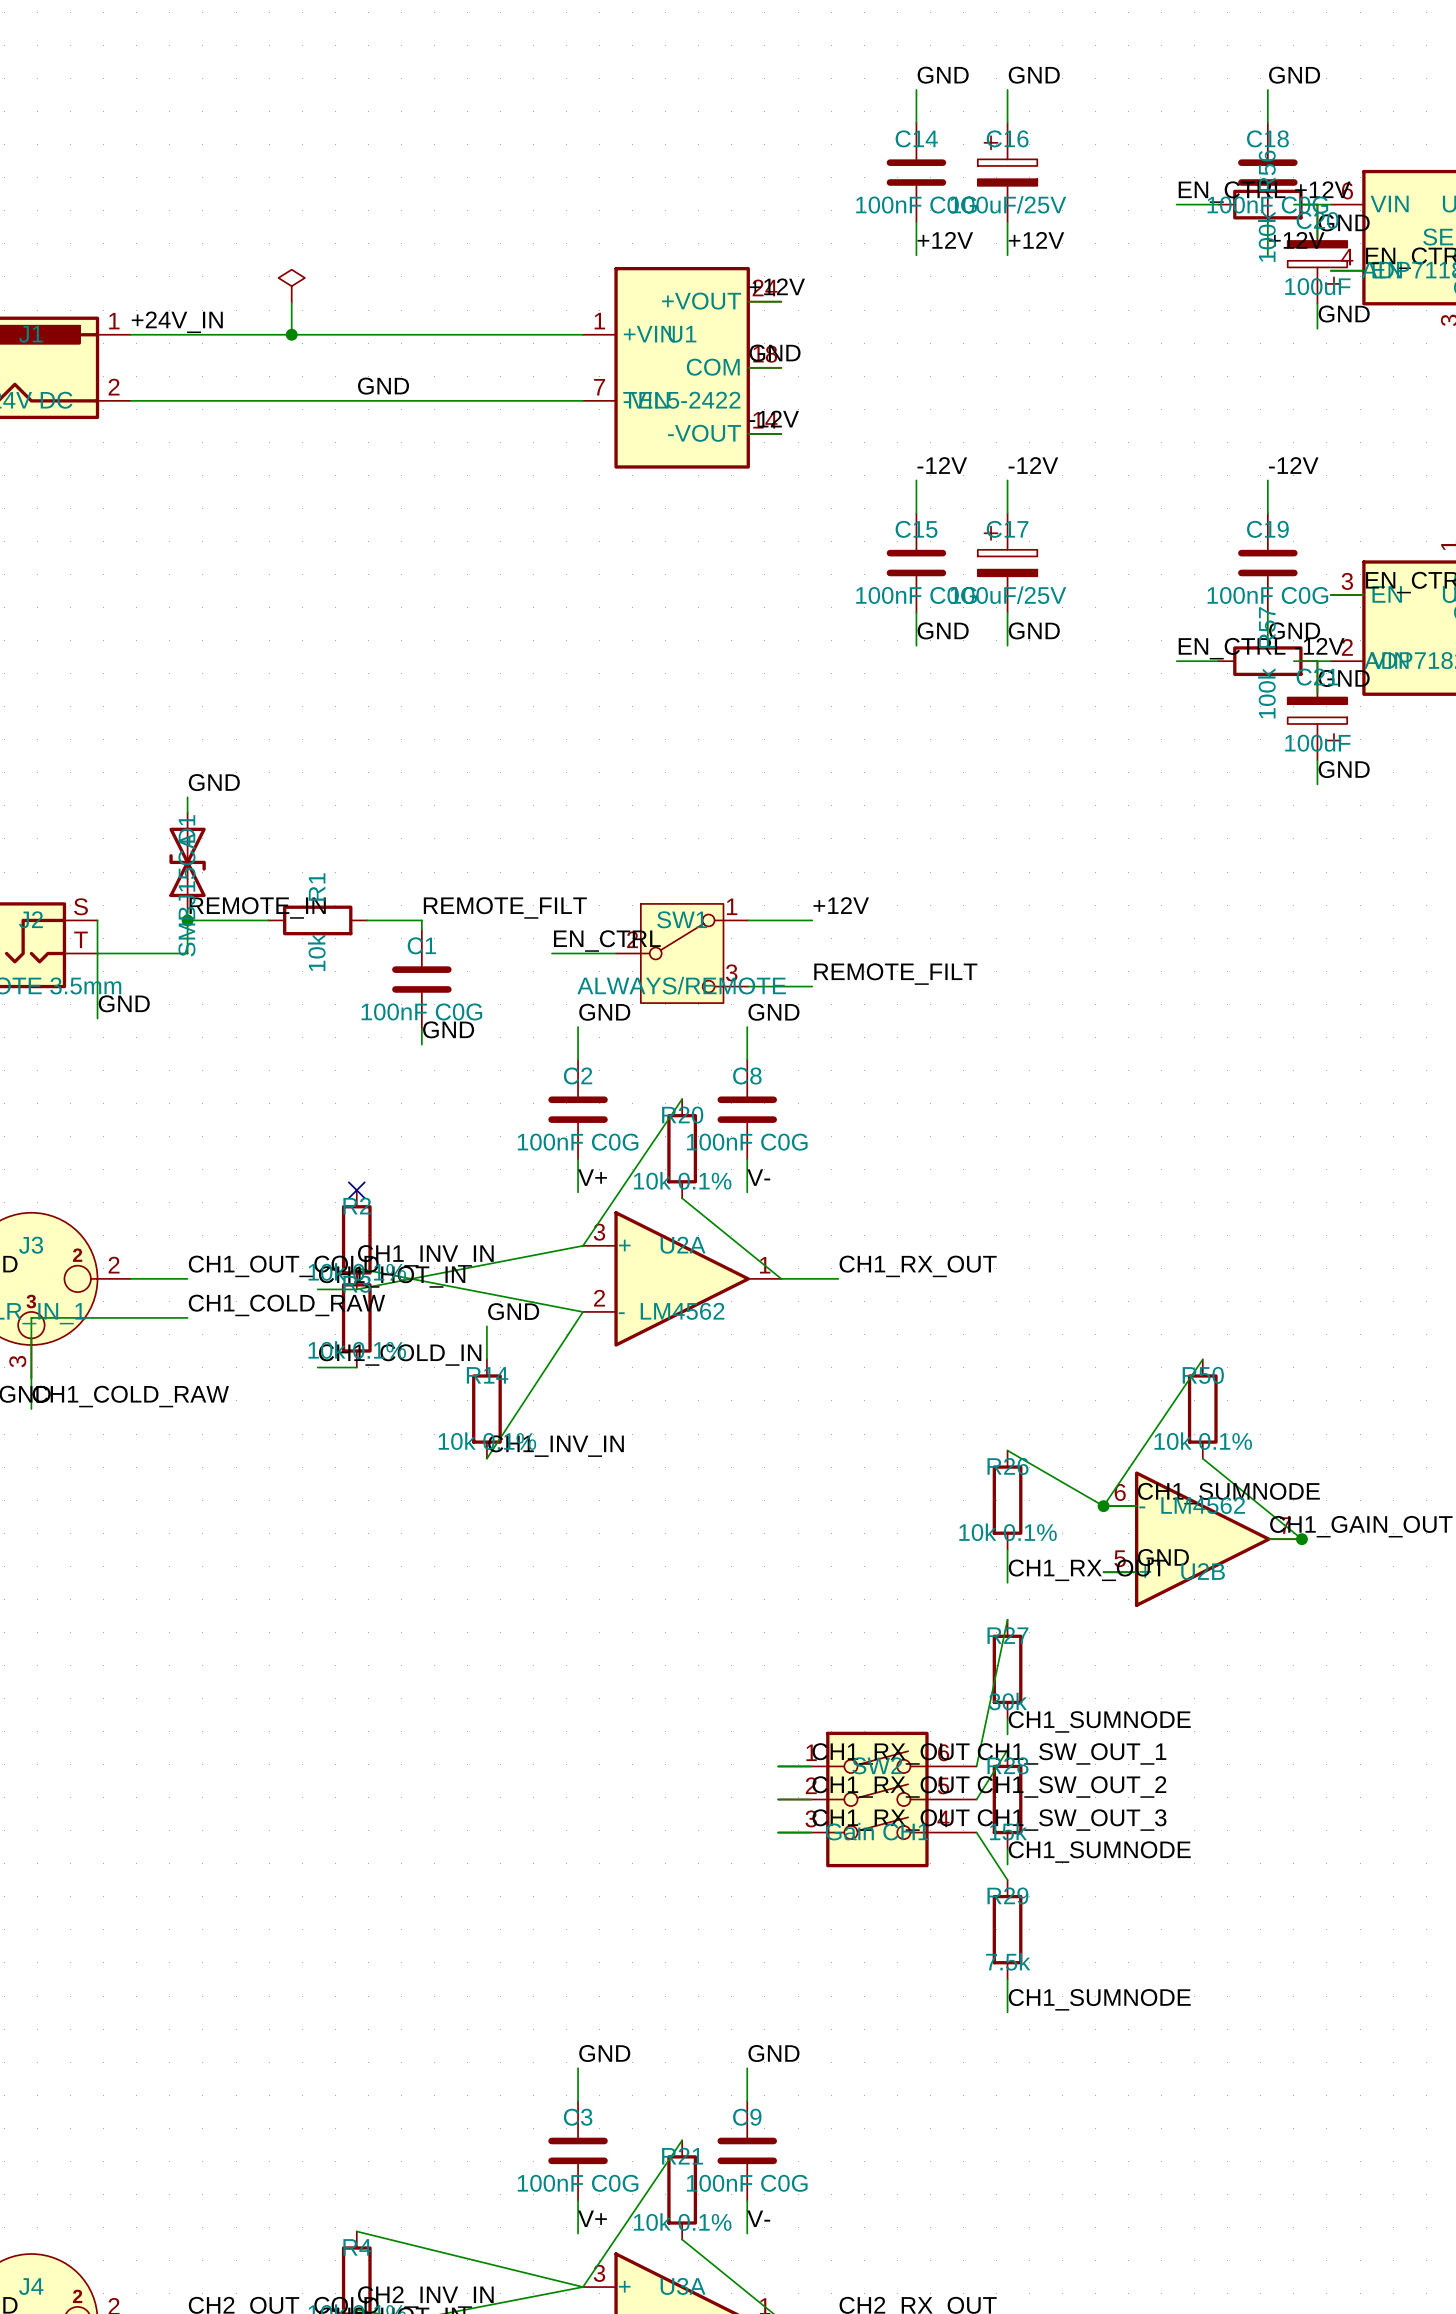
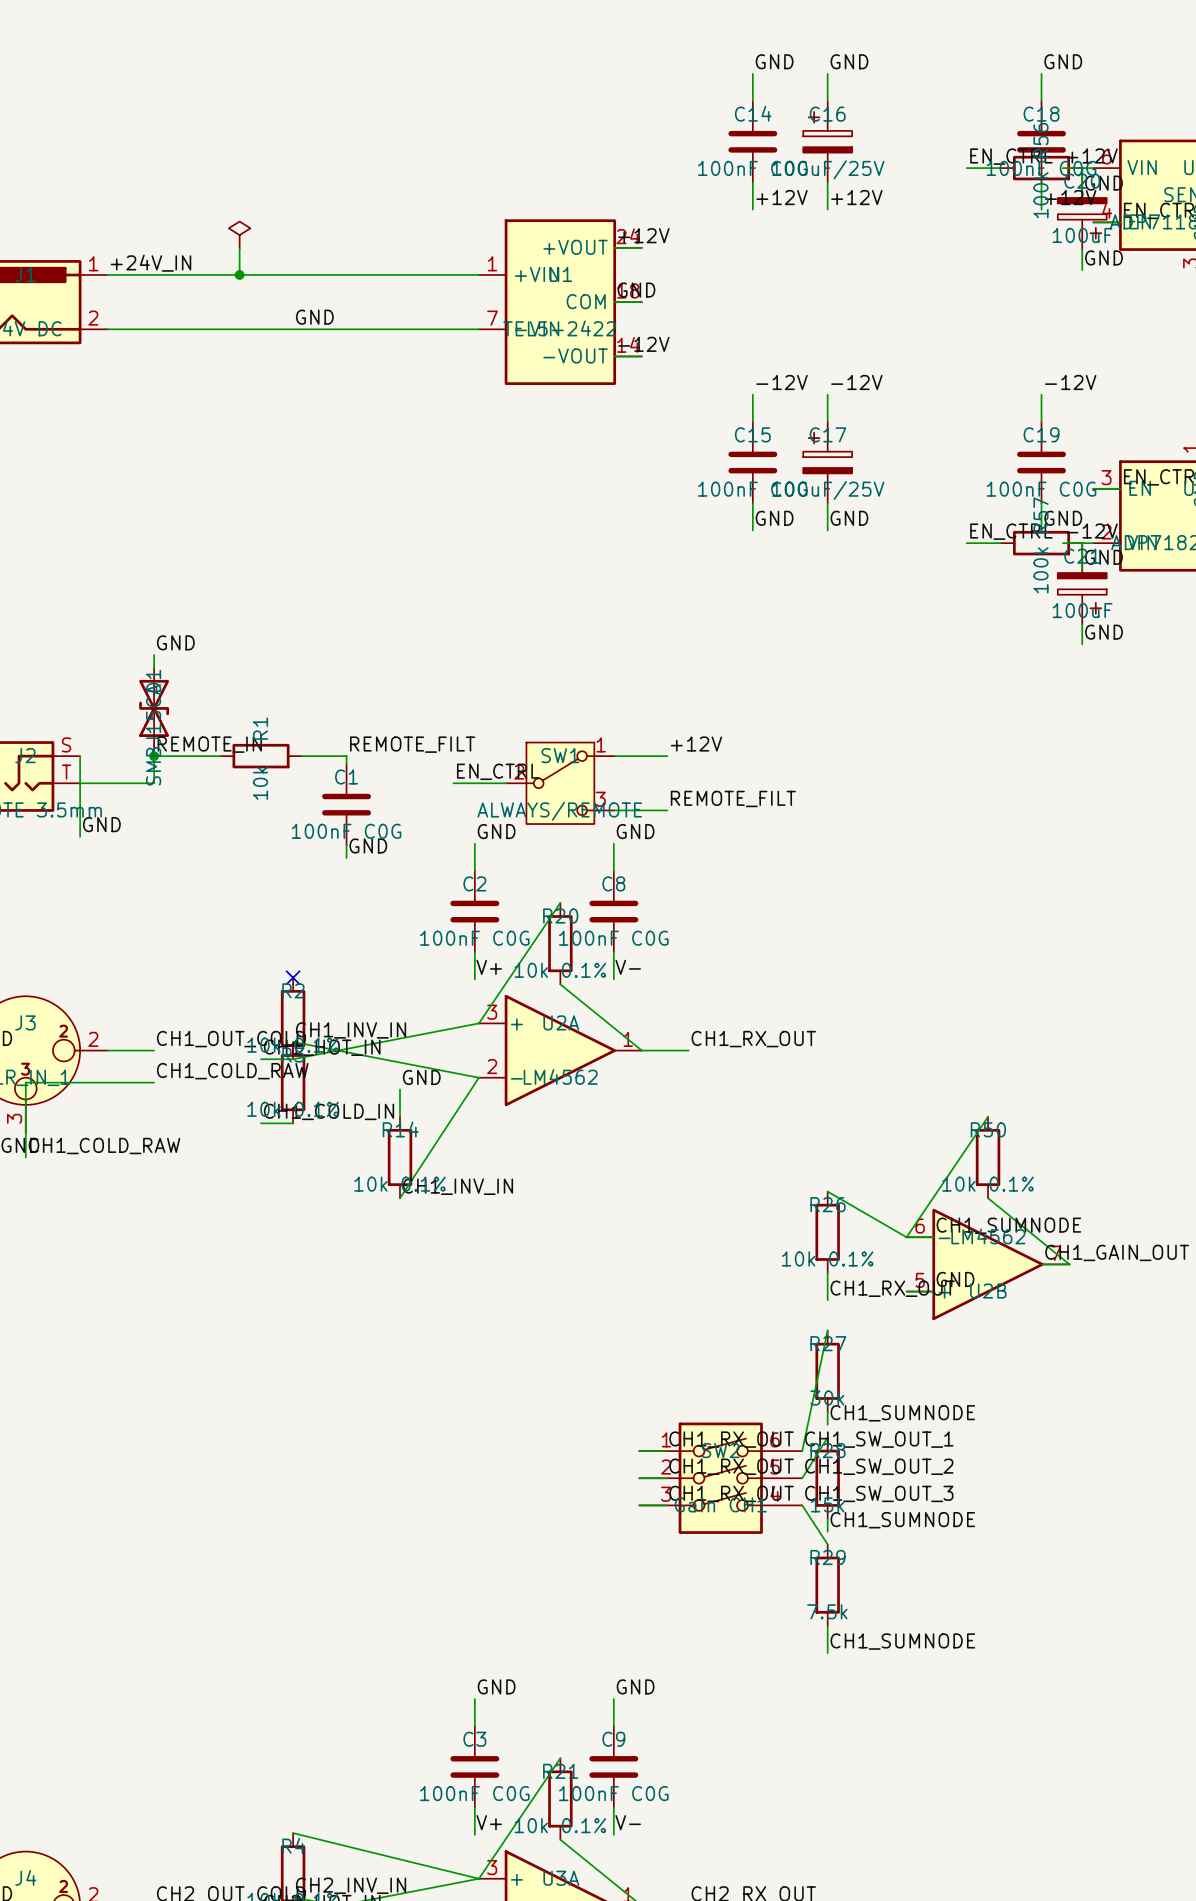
junction: (1103, 1506) -> none
junction: (1301, 1539) -> none

